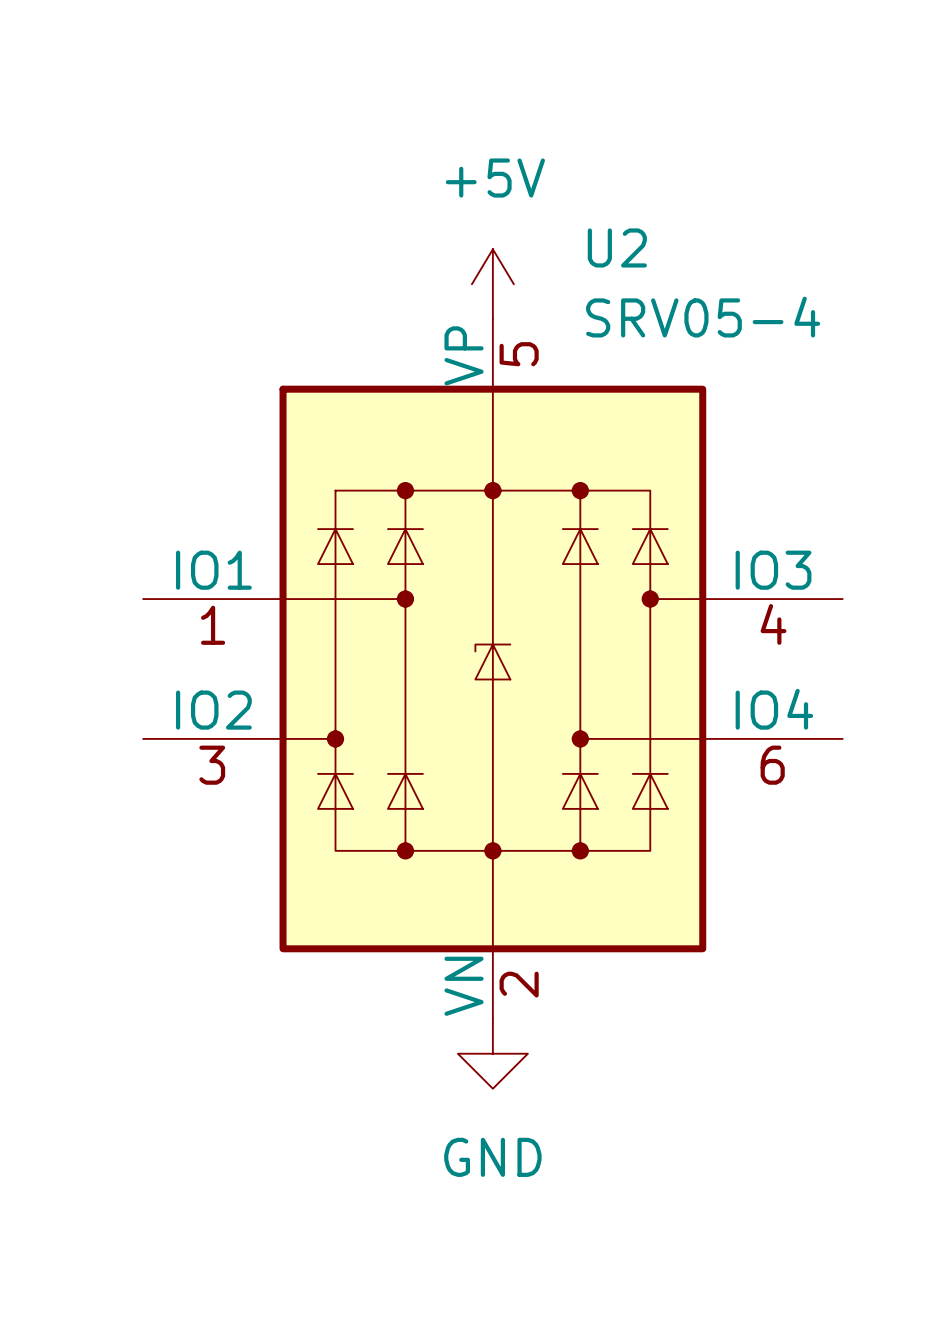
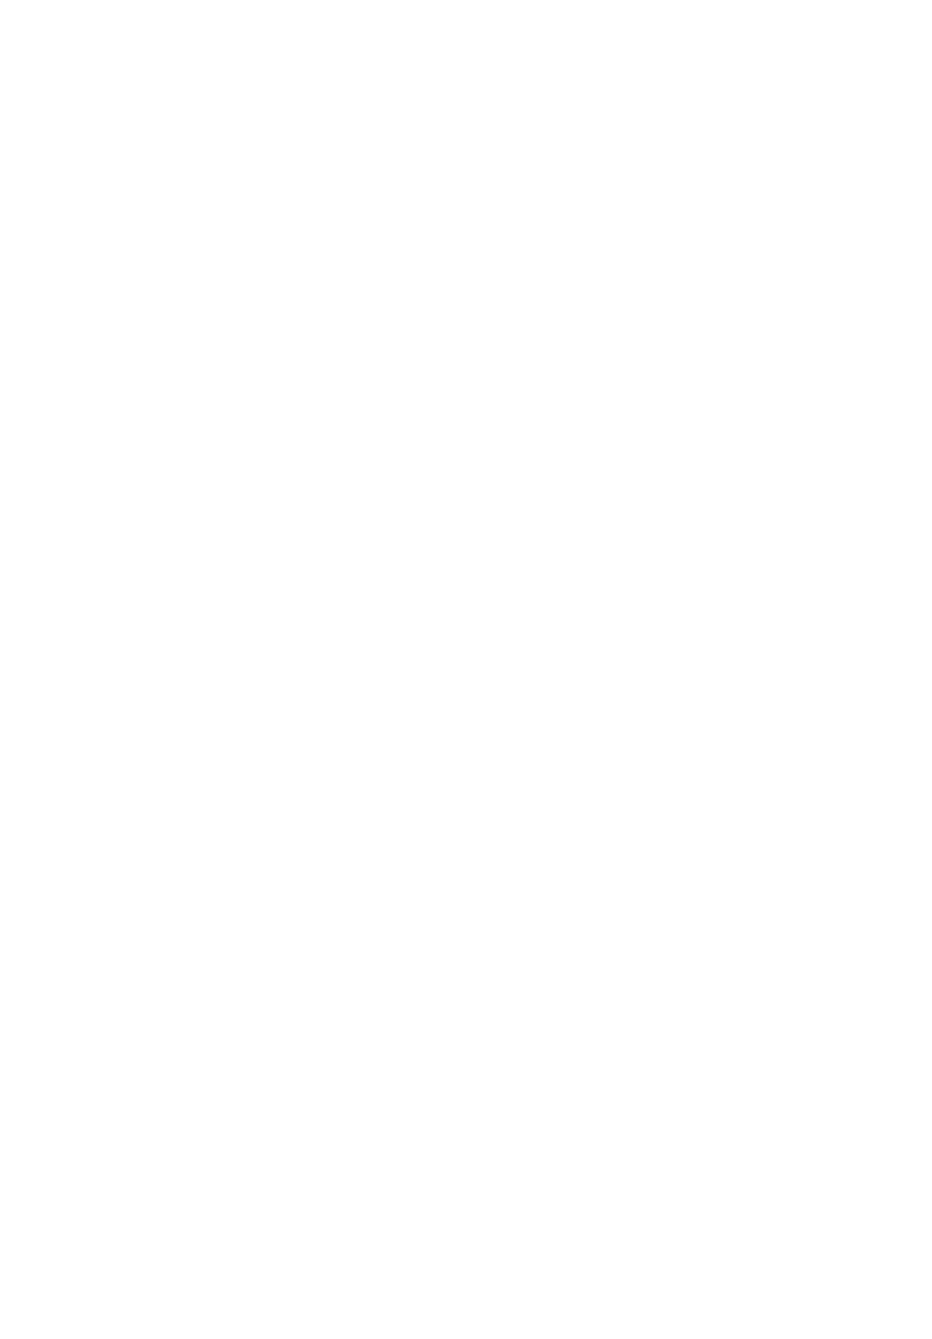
power symbol: +5V (492, 284) -> none
U2: SRV05-4 (492, 668) -> none
power symbol: GND (492, 1053) -> none

